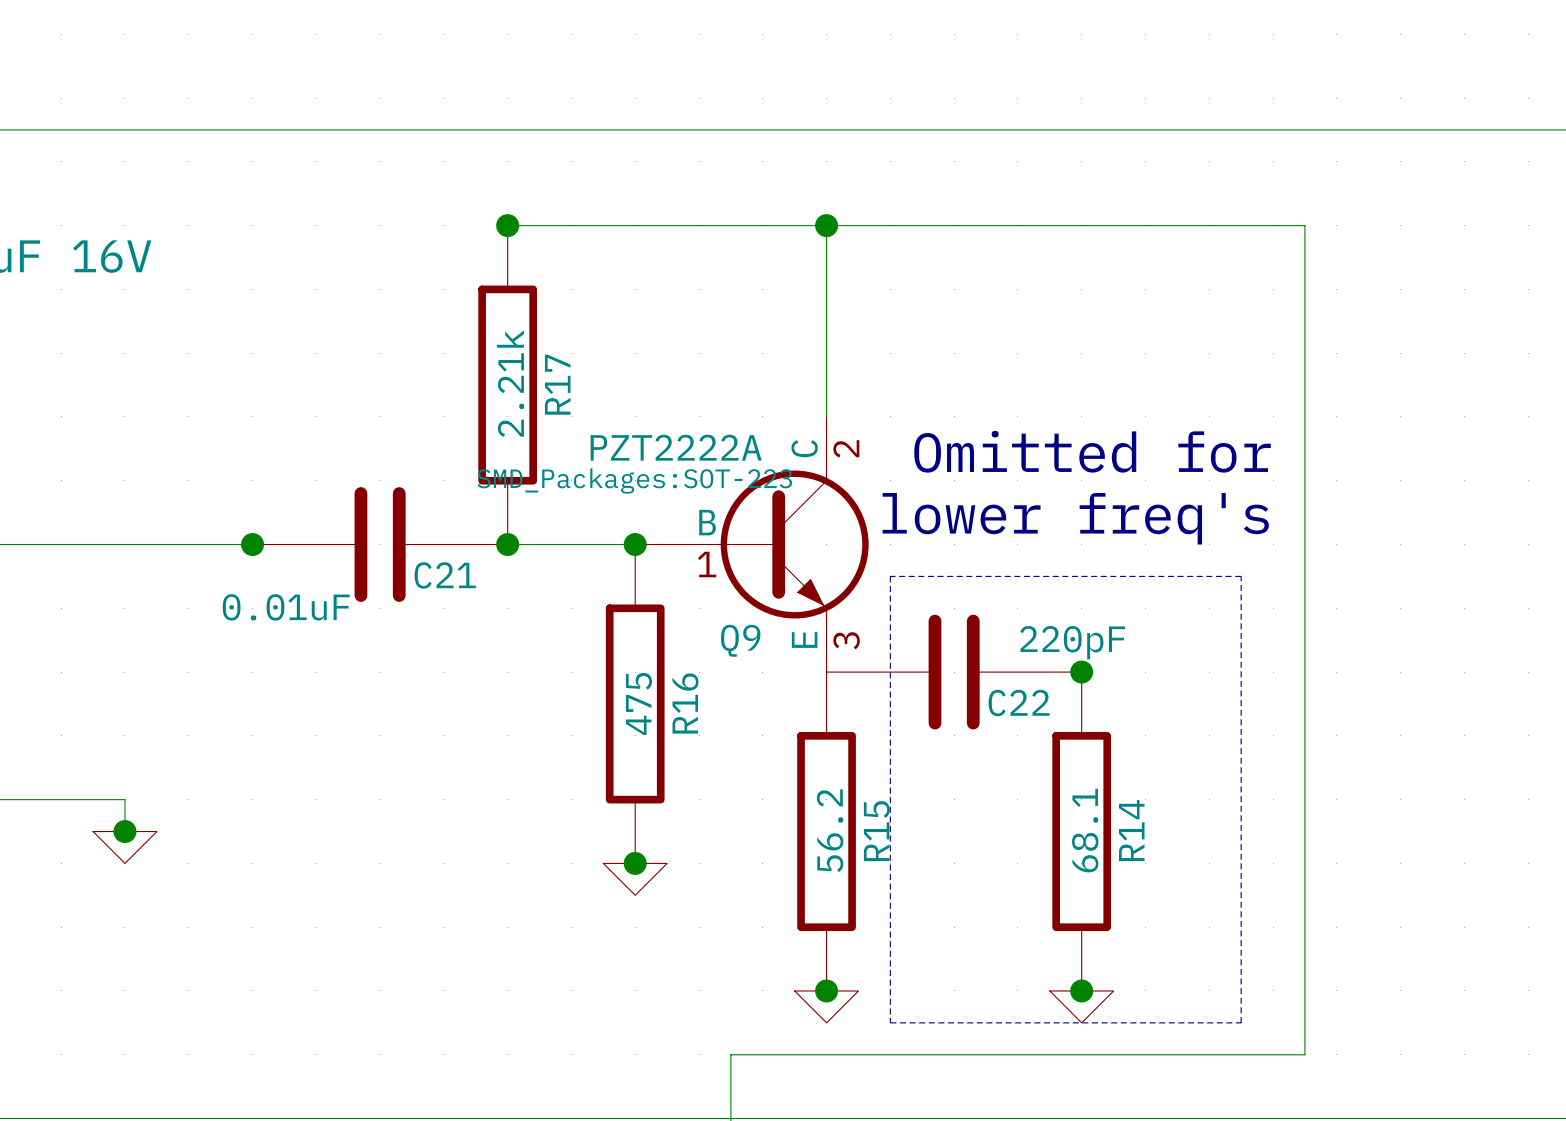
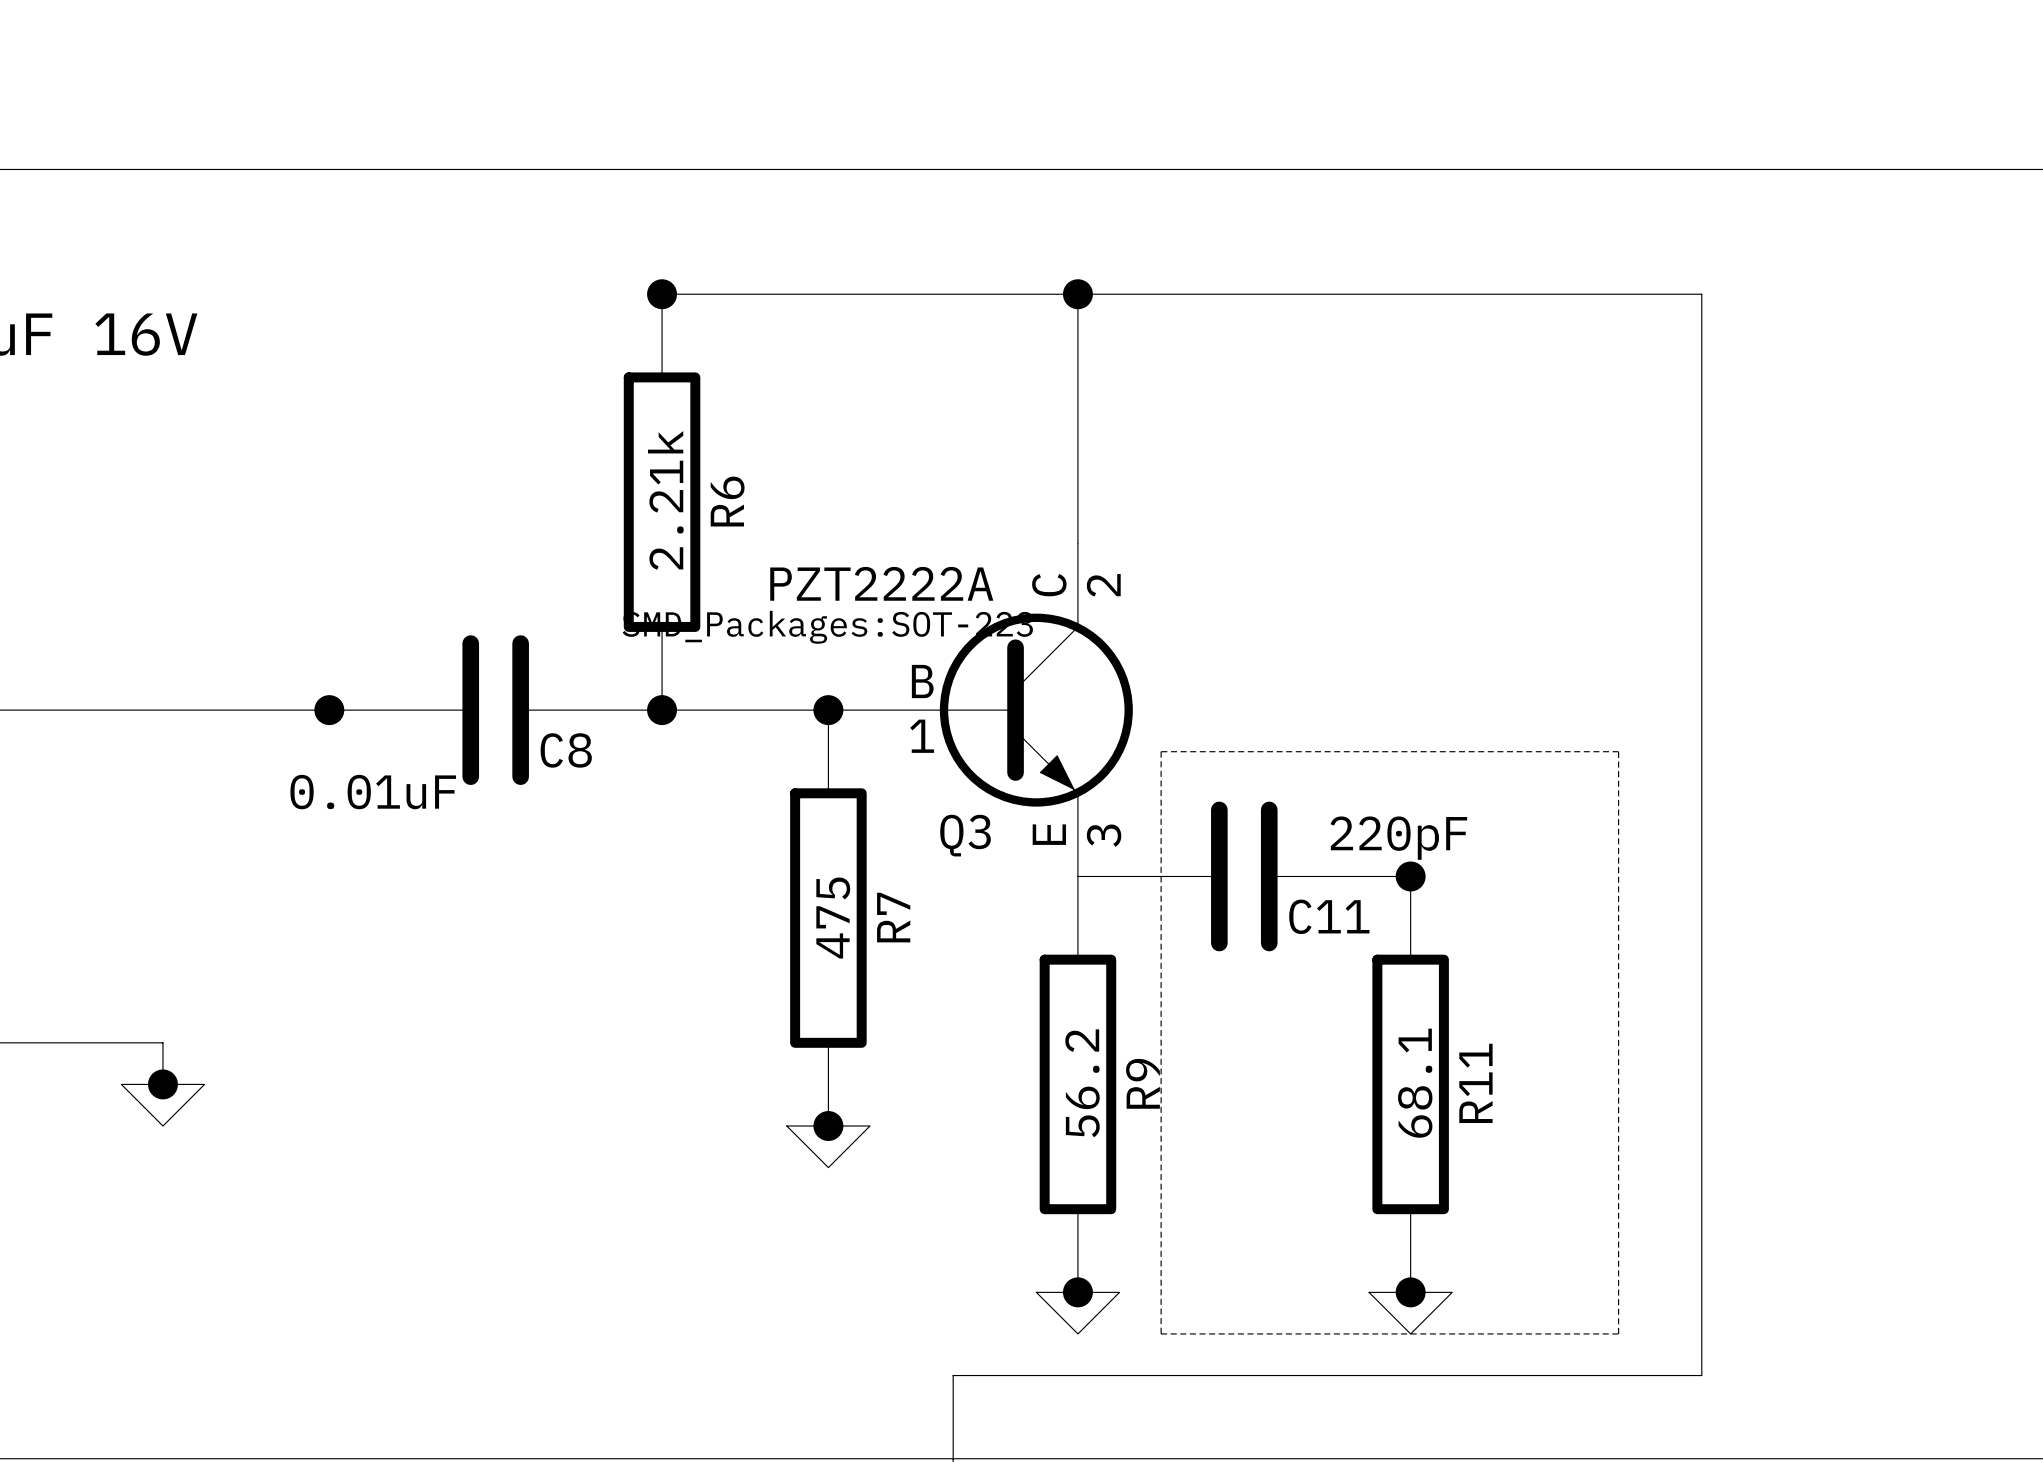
R17 name: R17 (557, 384) -> R6 (727, 501)
text: Omitted for (1092, 451) -> none
text: lower freq's (1075, 518) -> none
C21 name: C21 (445, 575) -> C8 (566, 750)
Q9 name: Q9 (740, 640) -> Q3 (965, 835)
R16 name: R16 (685, 703) -> R7 (893, 917)
C22 name: C22 (1019, 703) -> C11 (1329, 916)
R14 name: R14 (1131, 830) -> R11 (1475, 1083)
R15 name: R15 (876, 831) -> R9 (1142, 1083)

